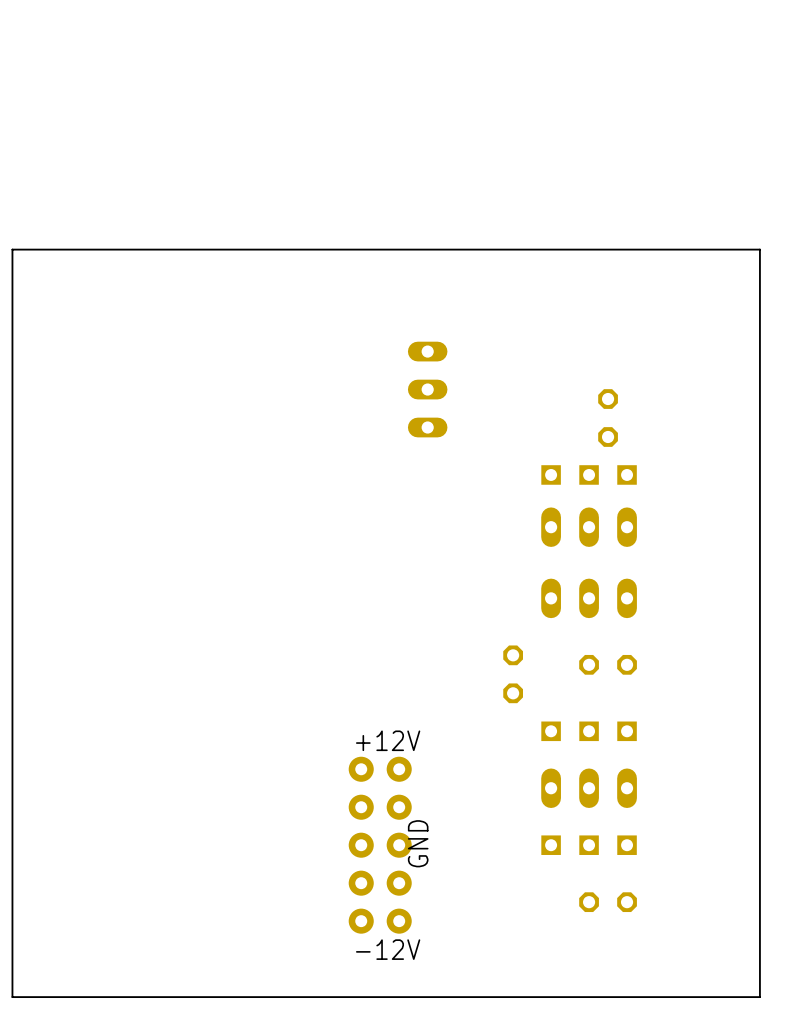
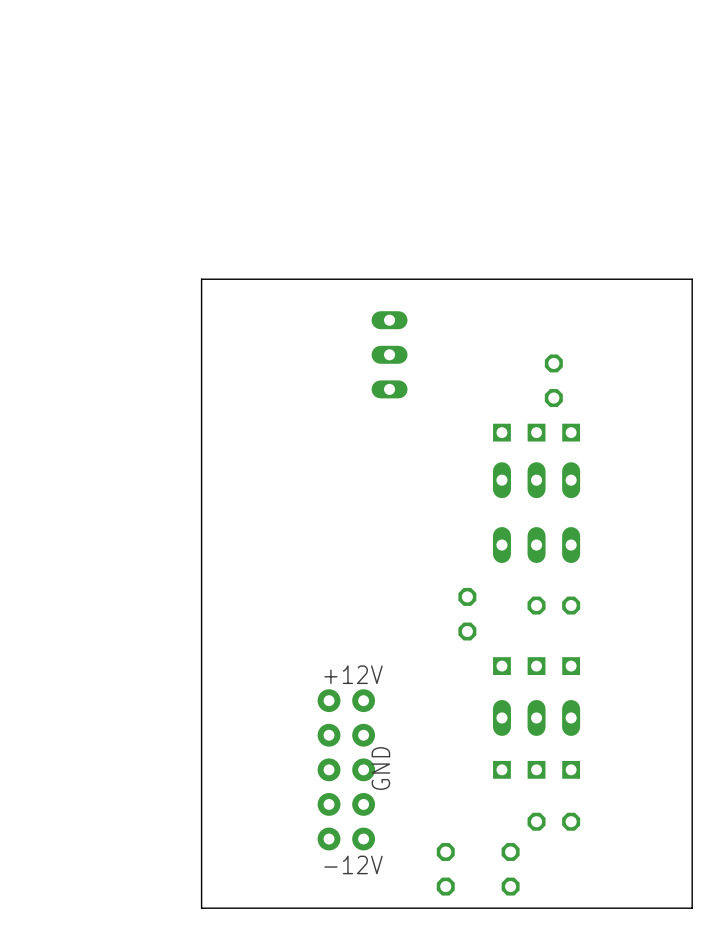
board edge: (759, 306) (759, 249) (12, 249) (12, 997) (221, 997) -> (692, 279) (201, 279) (201, 908)
part: none -> (445, 869)
part: none -> (510, 869)

